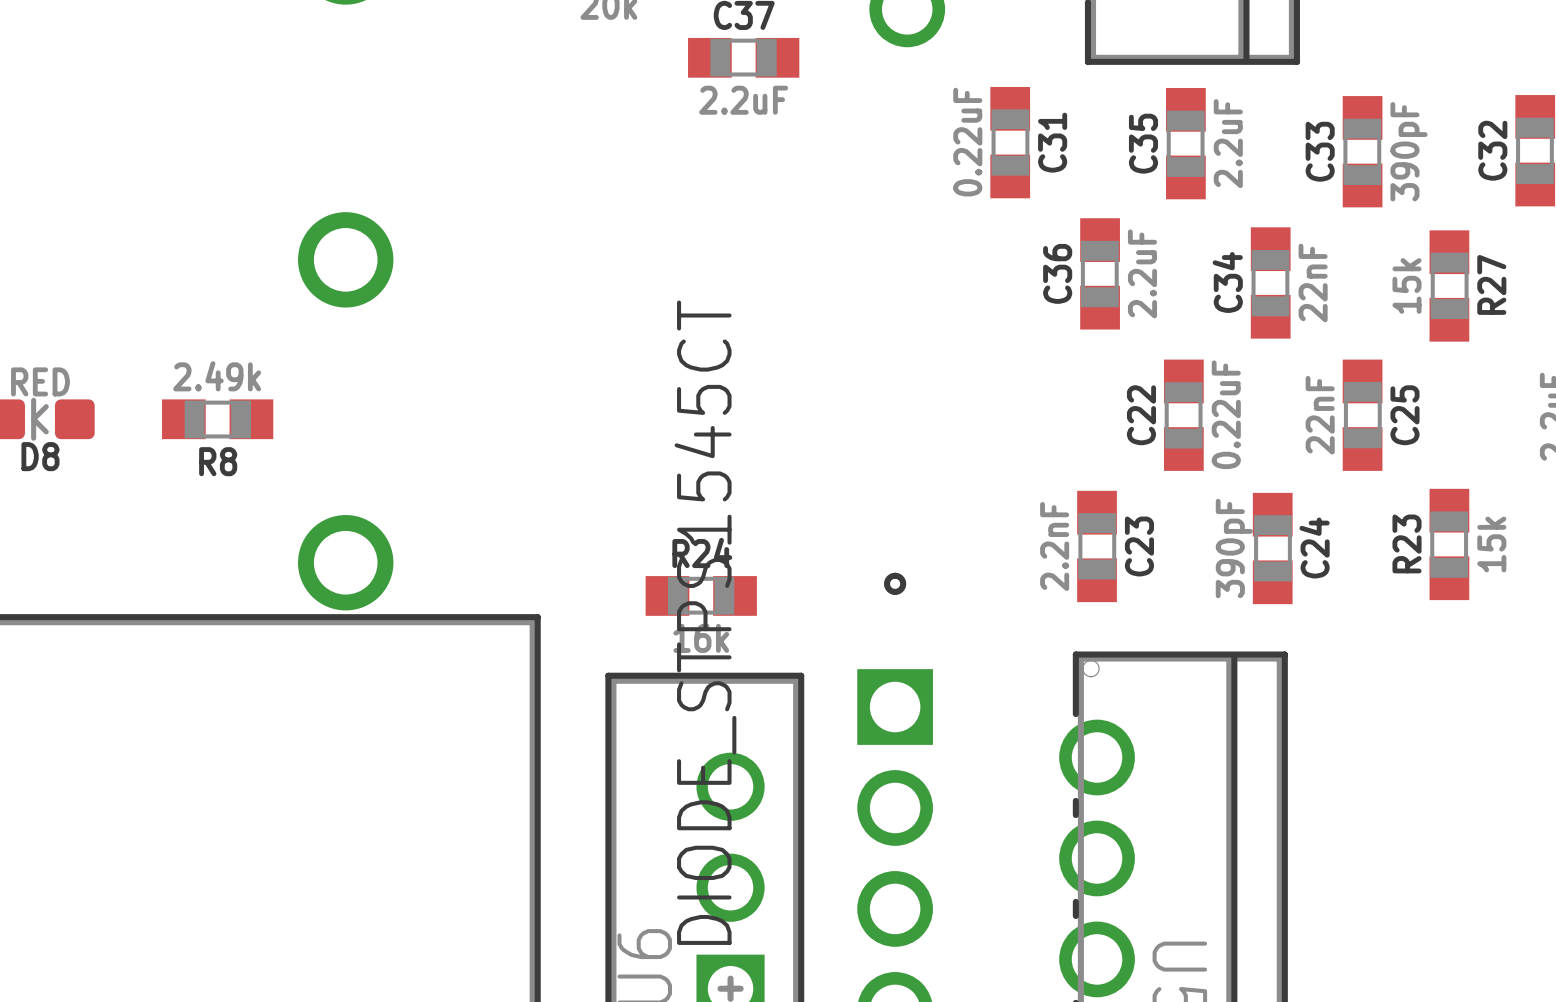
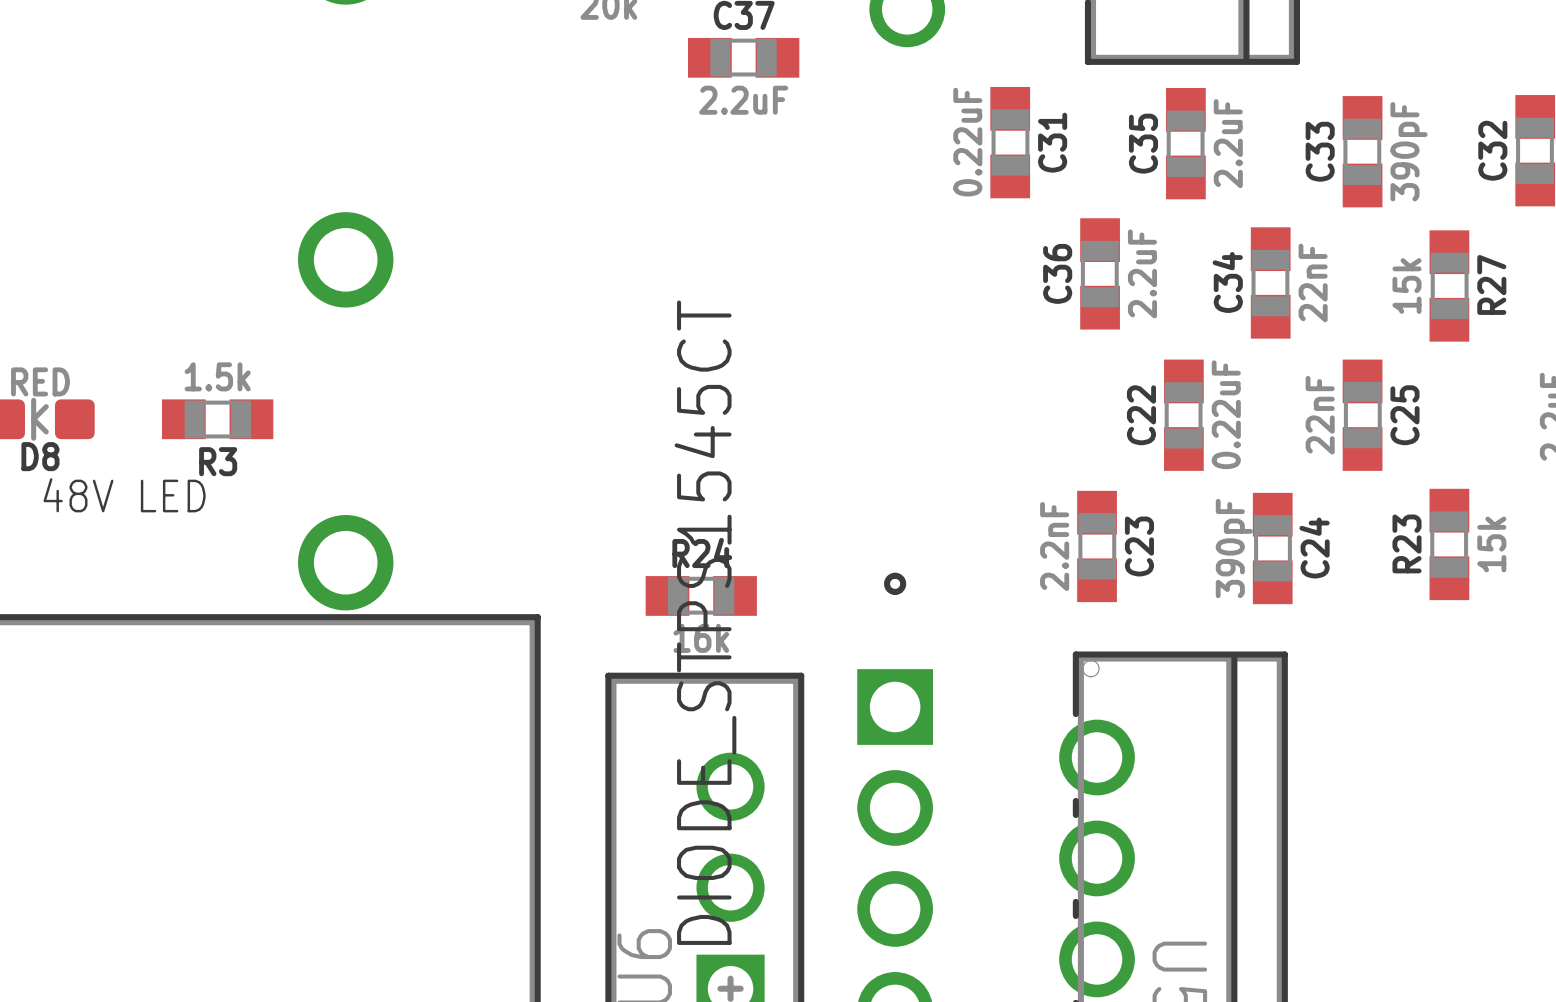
R8 value: 2.49k (217, 376) -> 1.5k (217, 376)
R8 name: R8 (218, 461) -> R3 (218, 461)
text: none -> 48V LED (124, 495)

